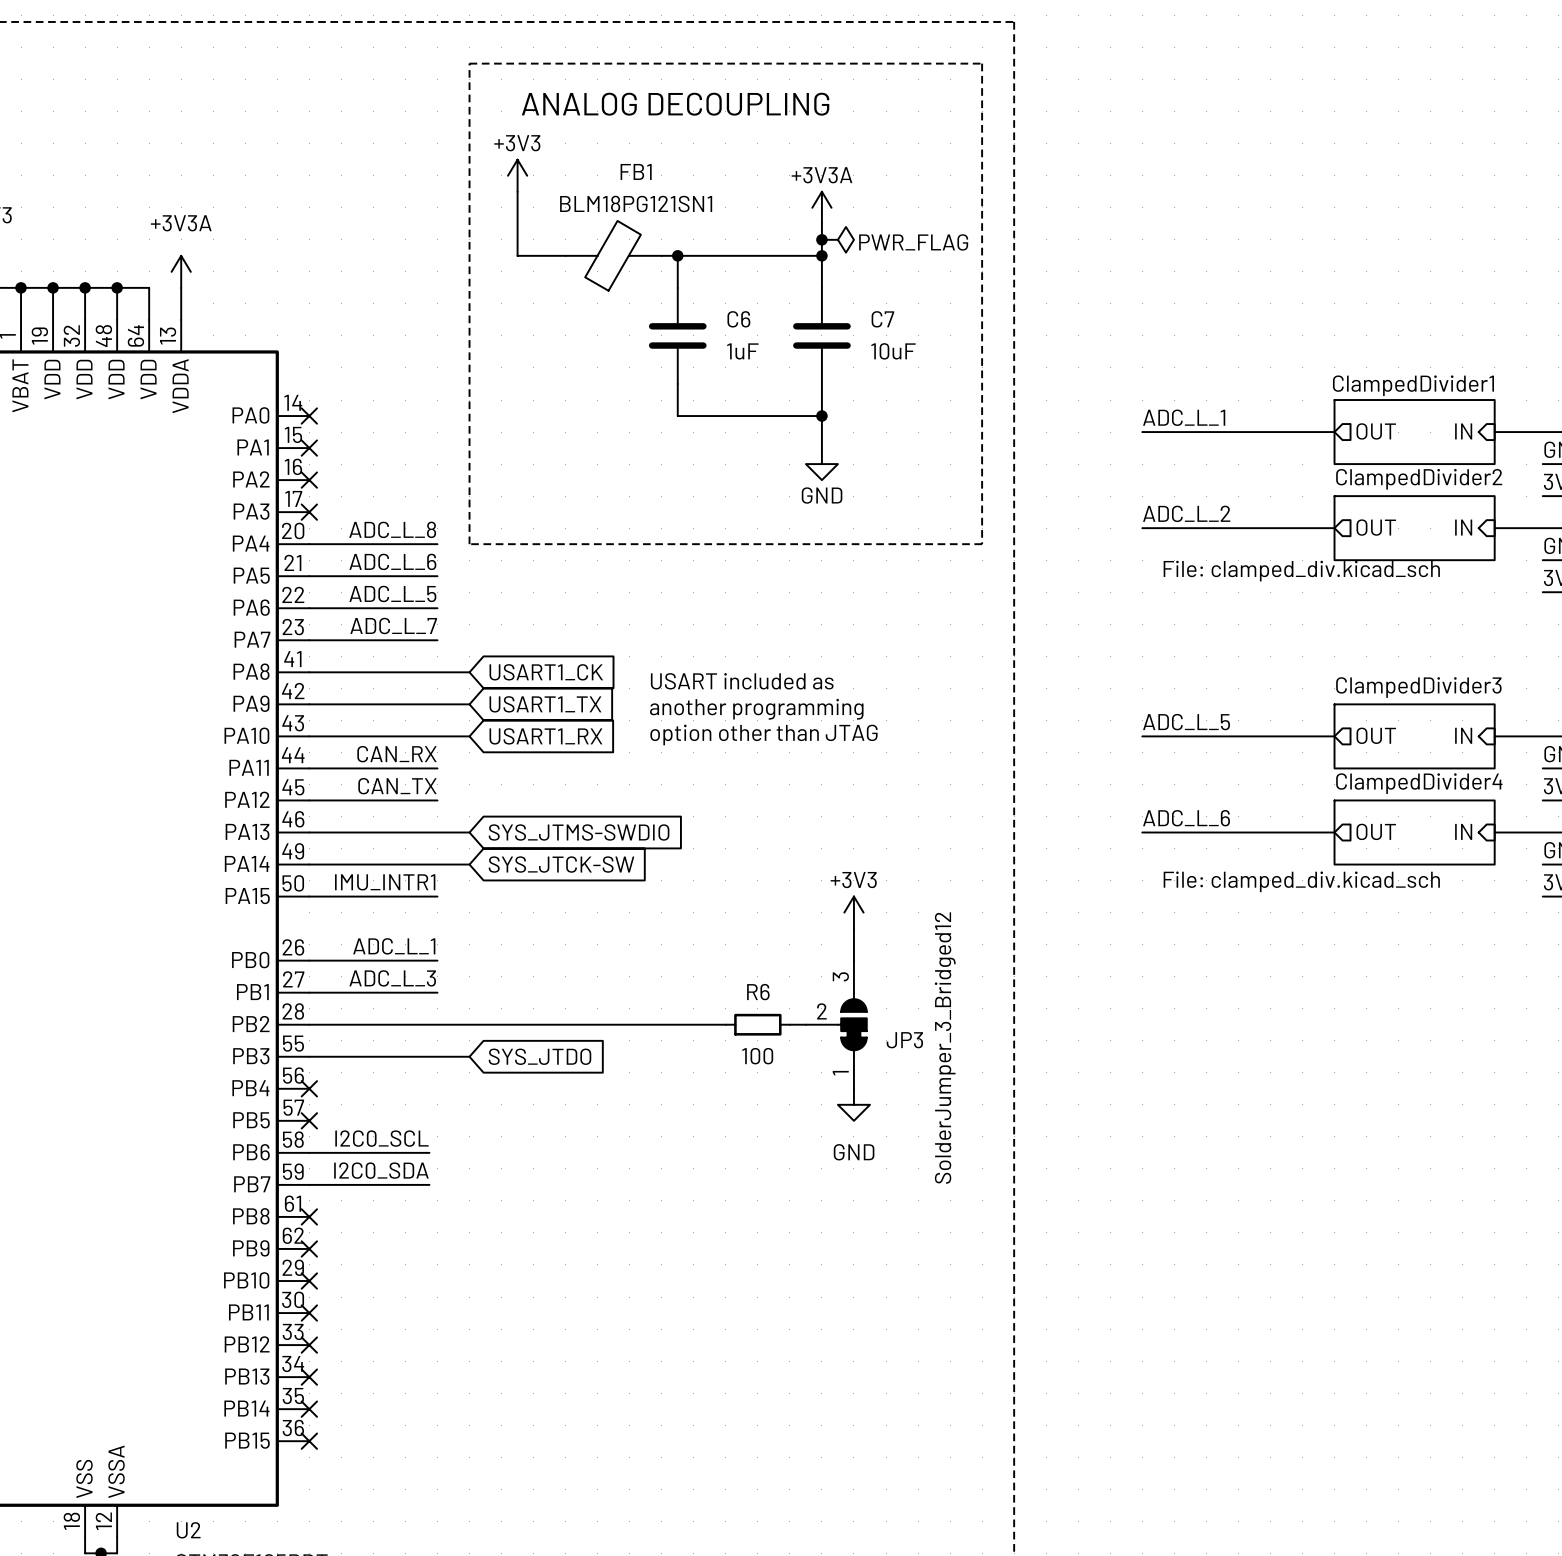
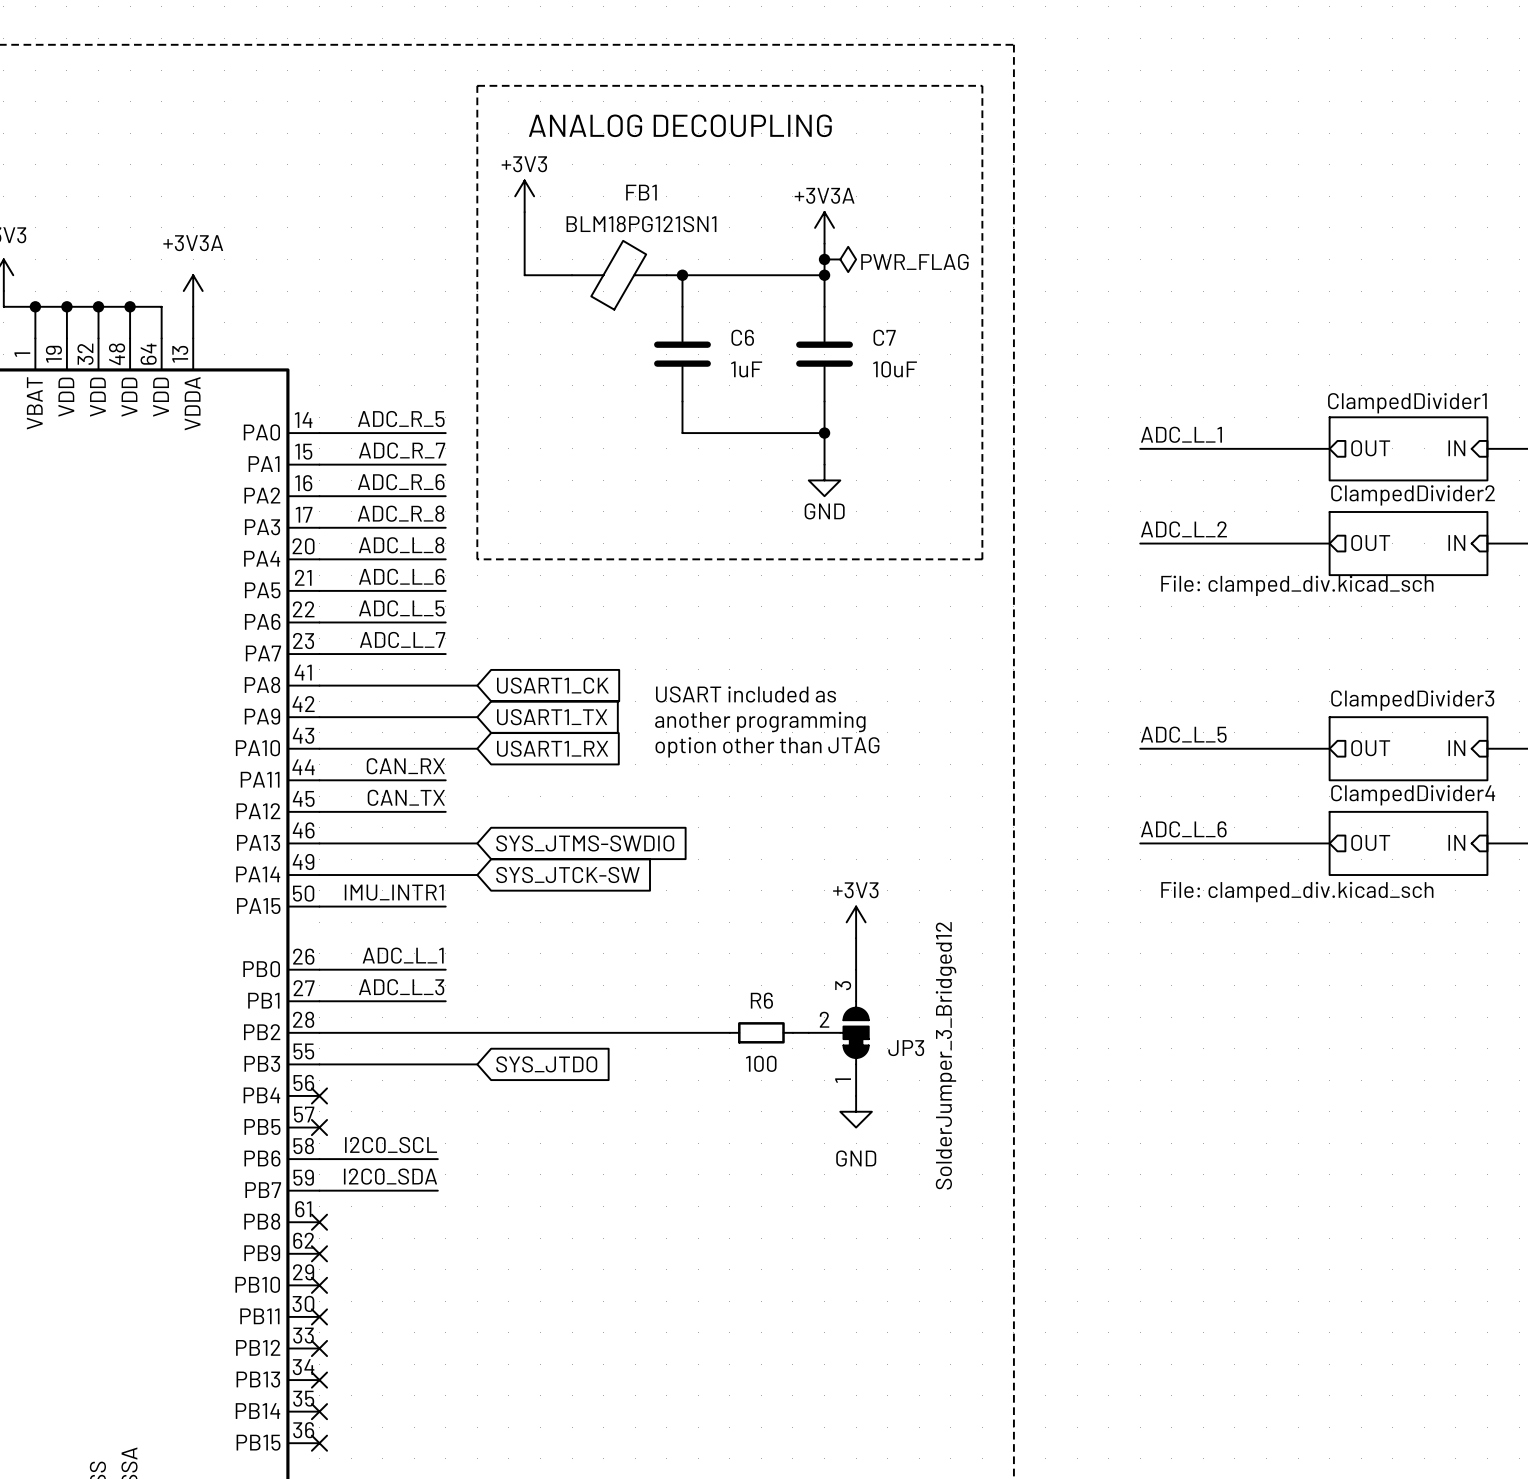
label: none -> ADC_R_5 (401, 419)
wire: none -> (319, 433) (445, 433)
no-connect mark: (309, 416) -> none
label: none -> ADC_R_7 (402, 450)
wire: none -> (319, 464) (445, 464)
no-connect mark: (309, 448) -> none
label: none -> ADC_R_6 (401, 482)
wire: none -> (319, 496) (445, 496)
no-connect mark: (309, 480) -> none
label: none -> ADC_R_8 (401, 513)
wire: none -> (319, 527) (445, 527)
no-connect mark: (309, 512) -> none

